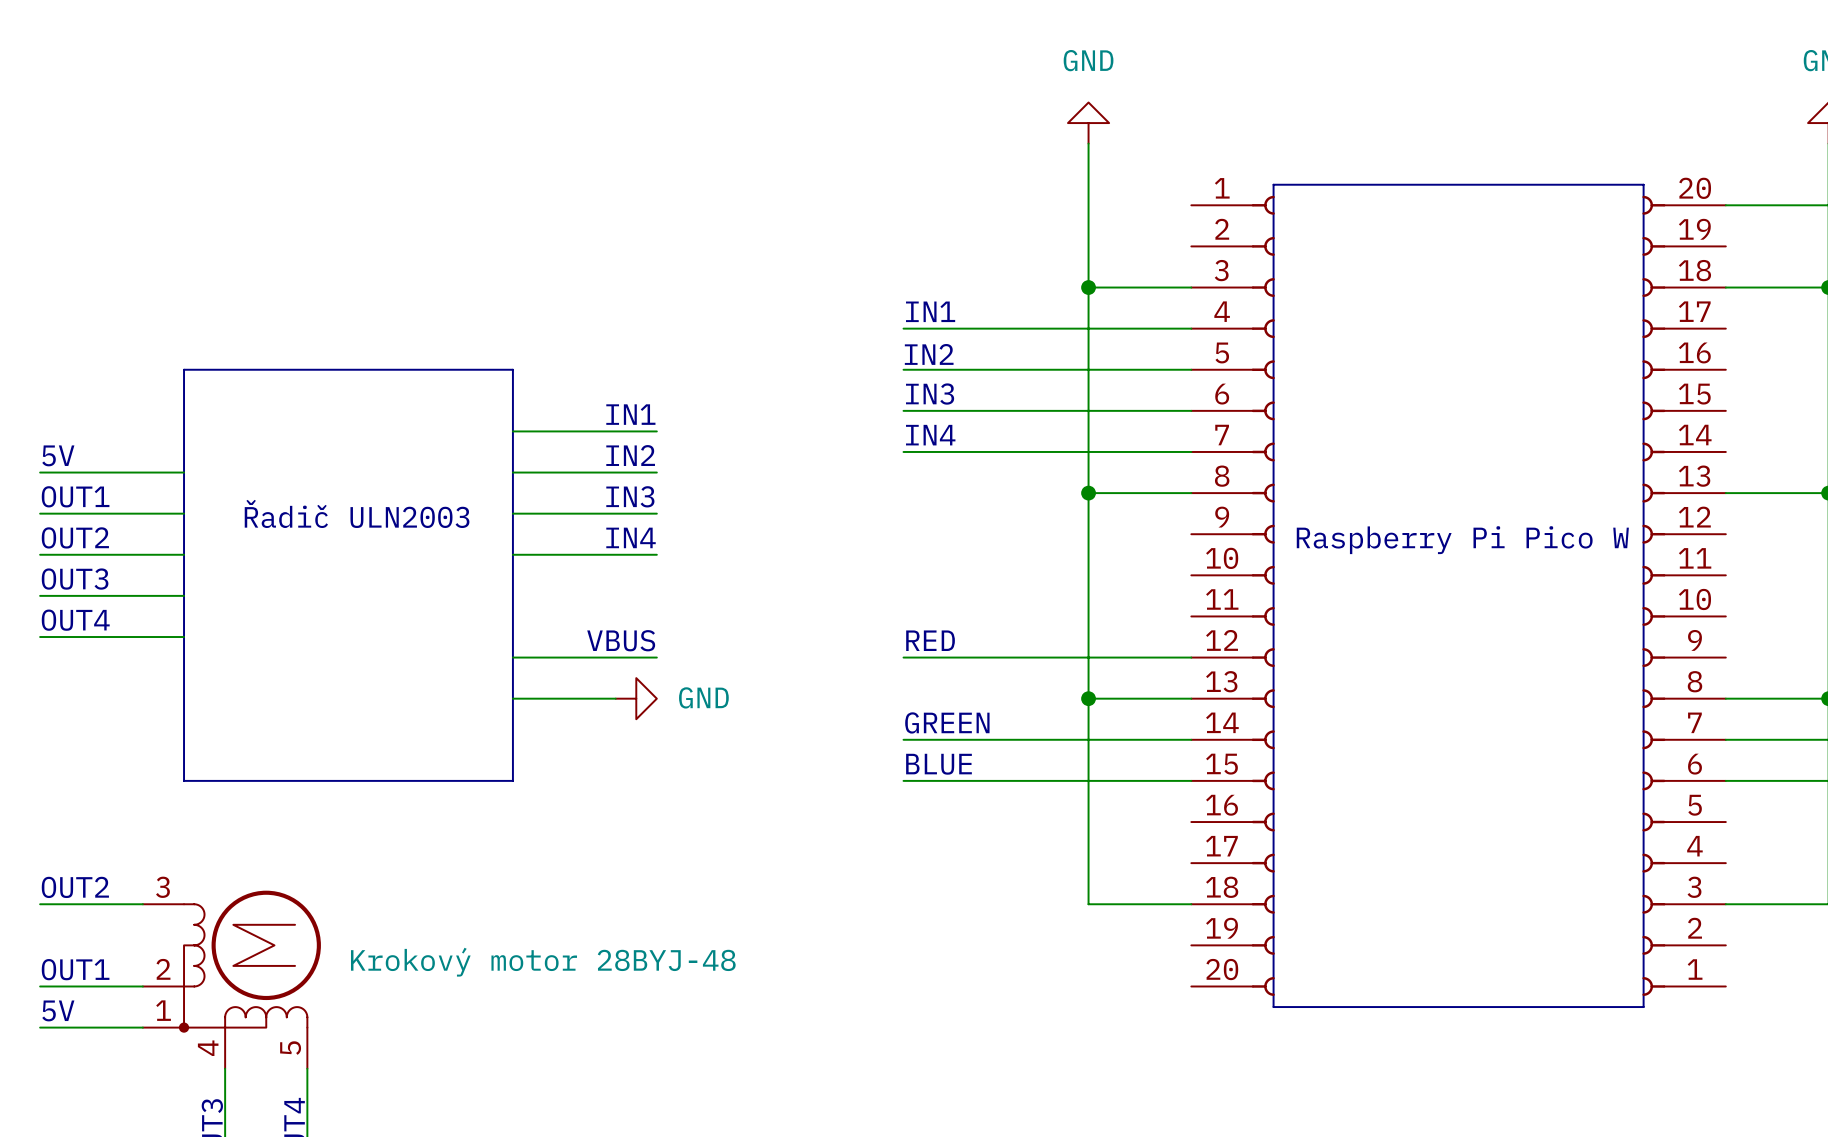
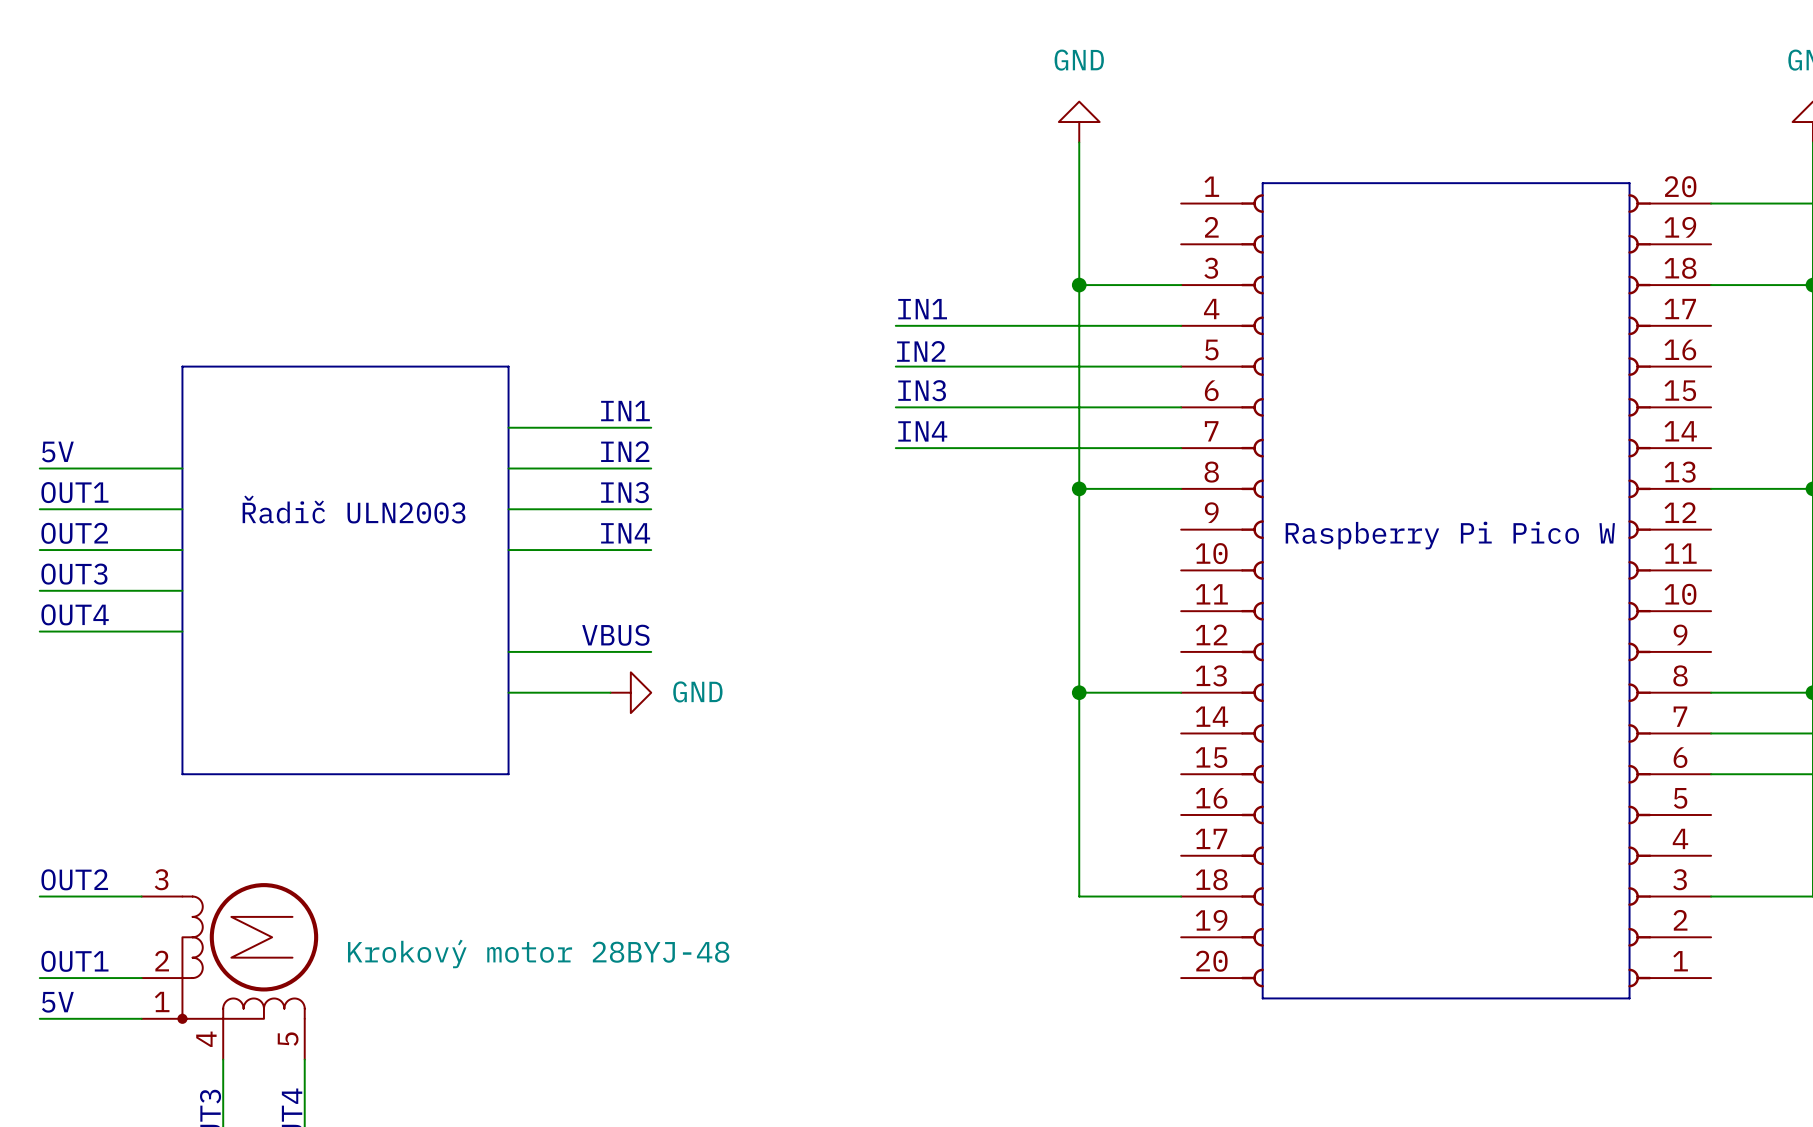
text: RED (930, 640) -> none
wire: (903, 657) (1191, 657) -> none
text: GREEN (947, 722) -> none
wire: (903, 739) (1191, 739) -> none
text: BLUE (938, 764) -> none
wire: (903, 780) (1191, 780) -> none

